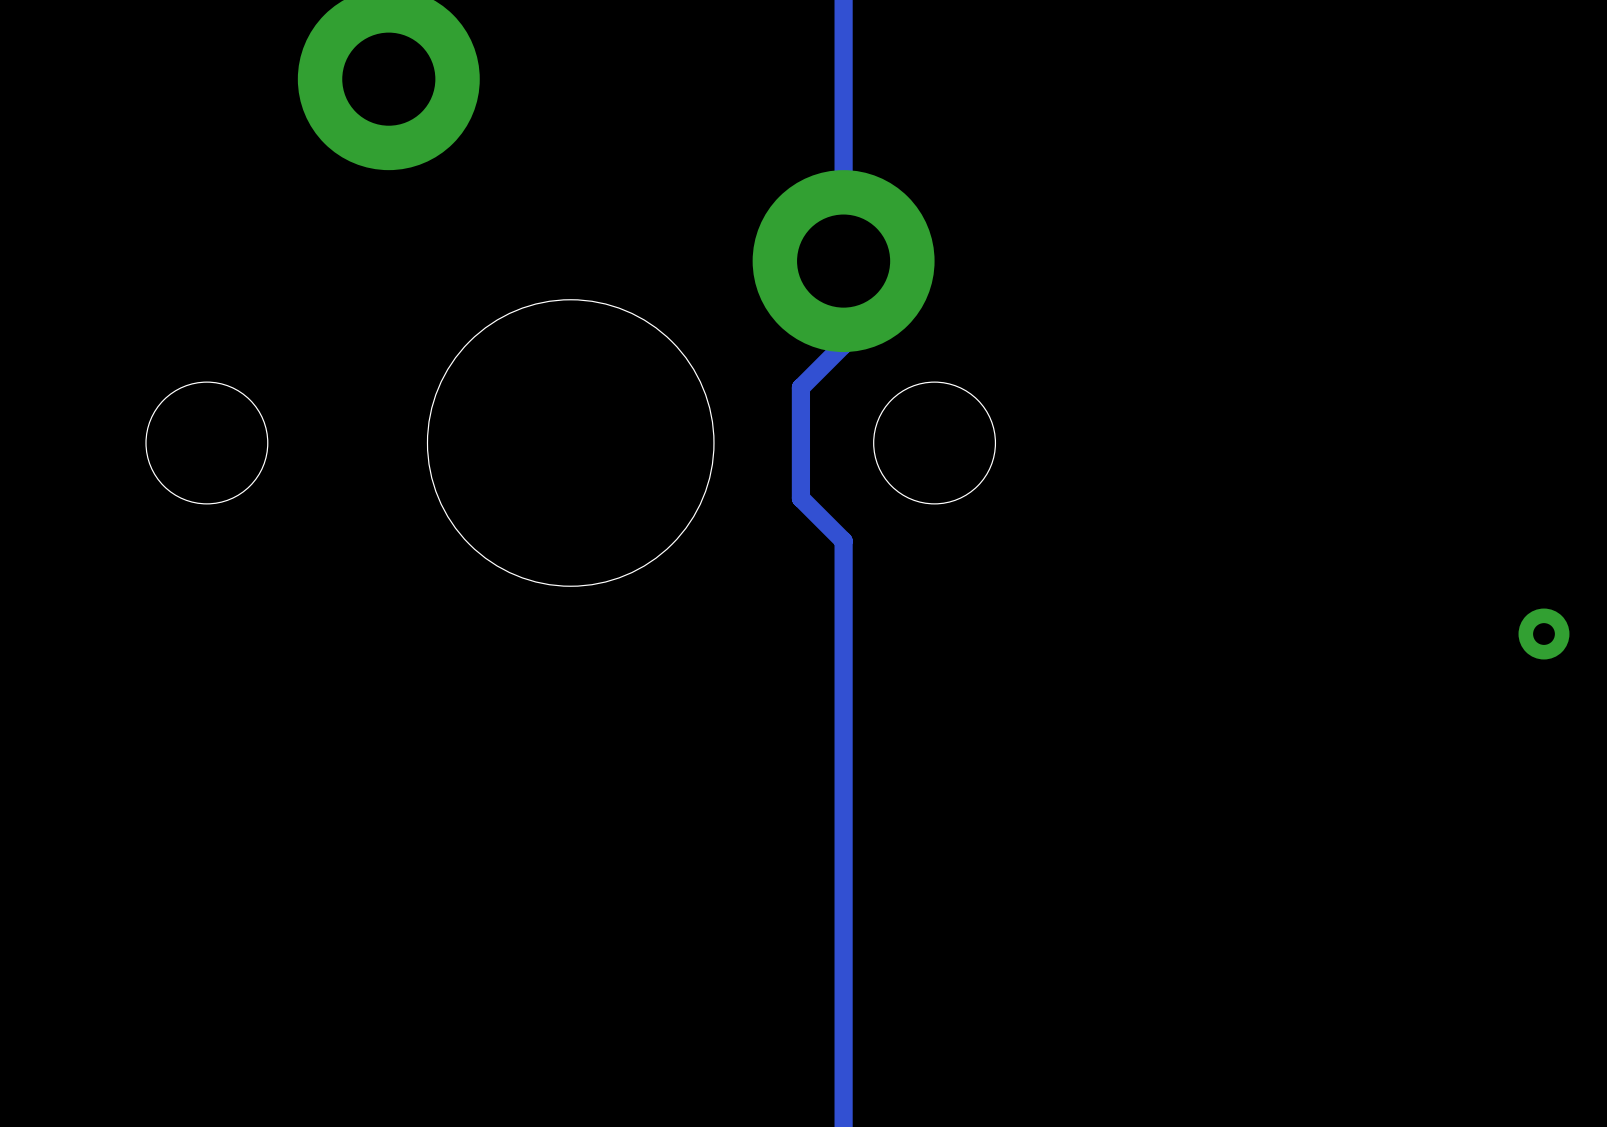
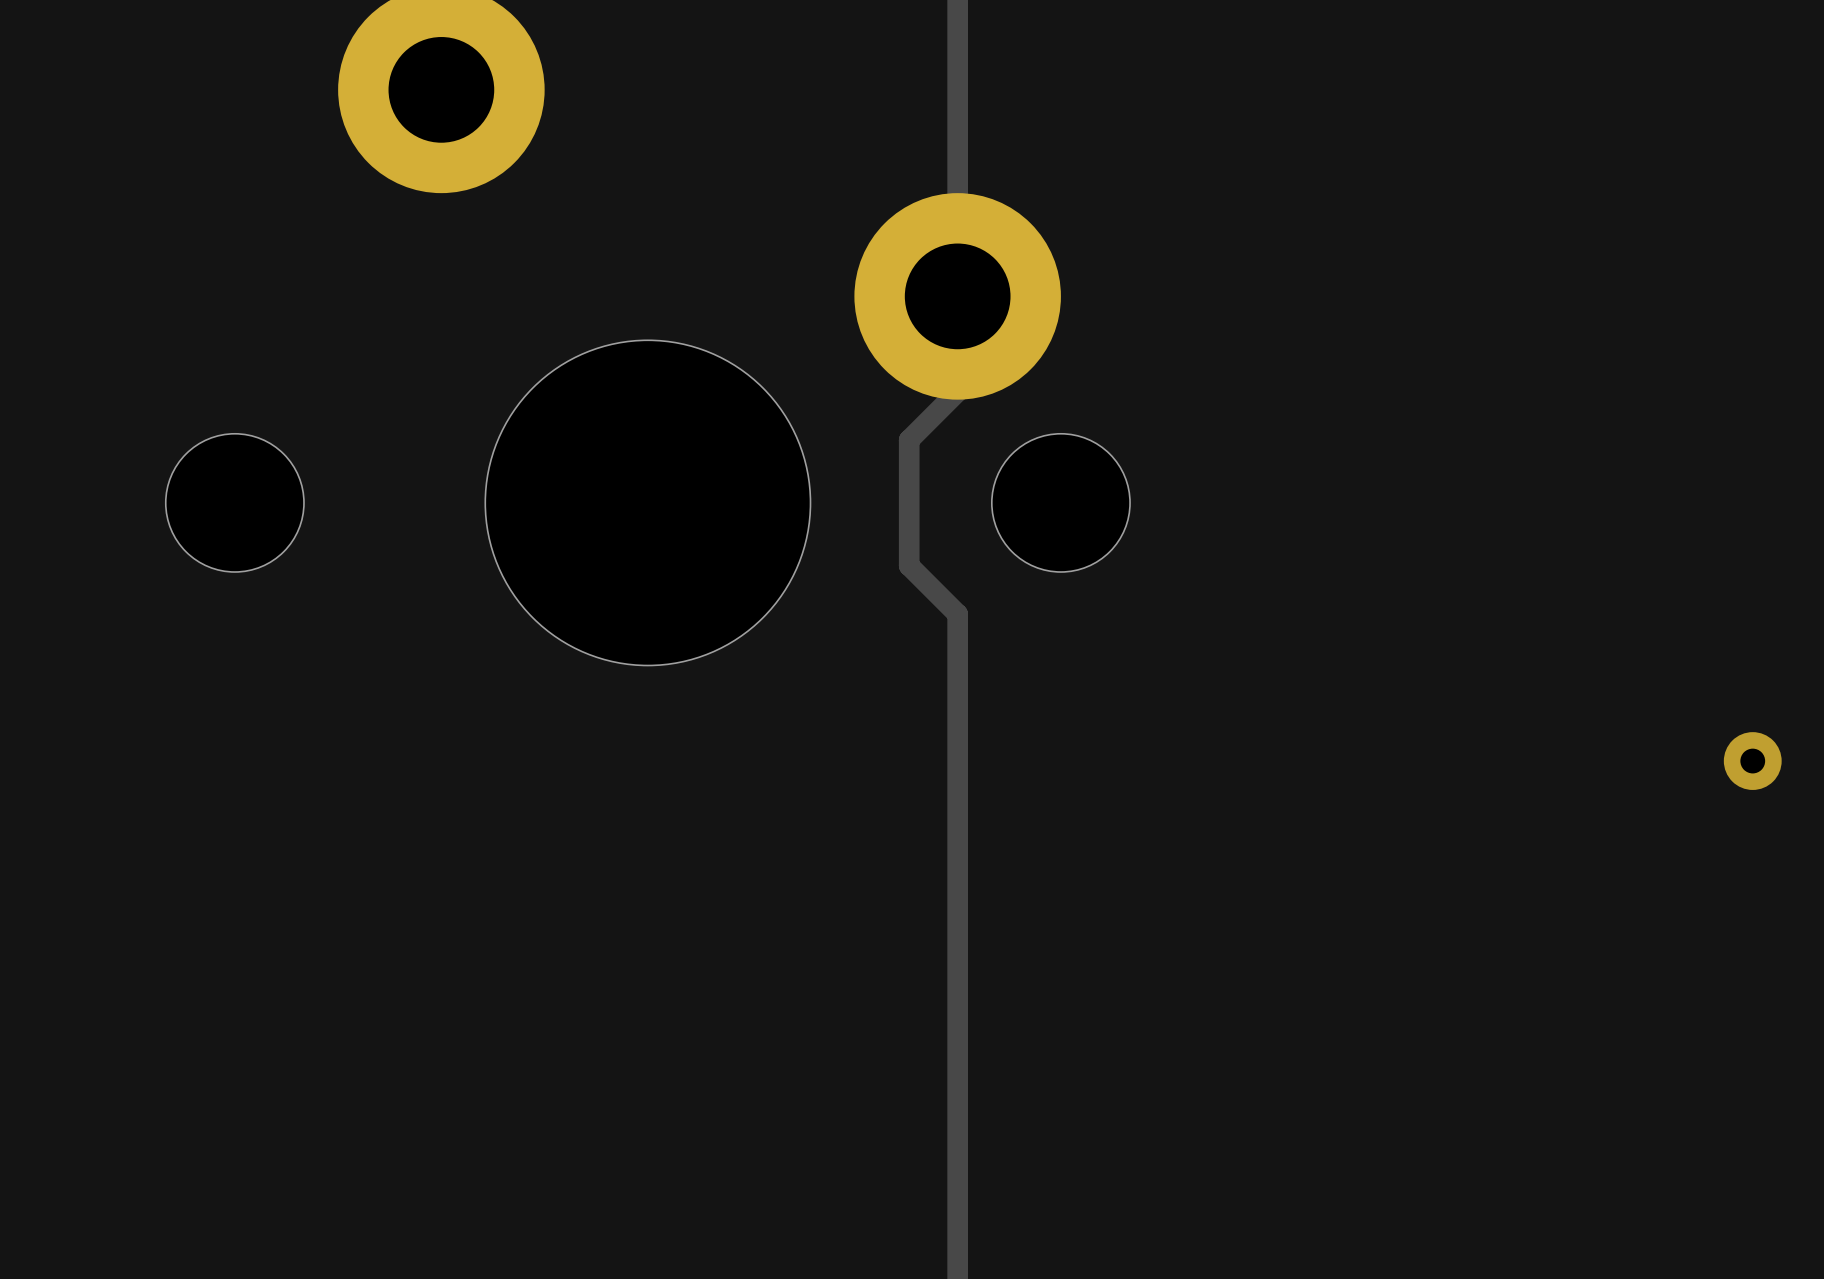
via position: (1543, 634) -> (1752, 761)

